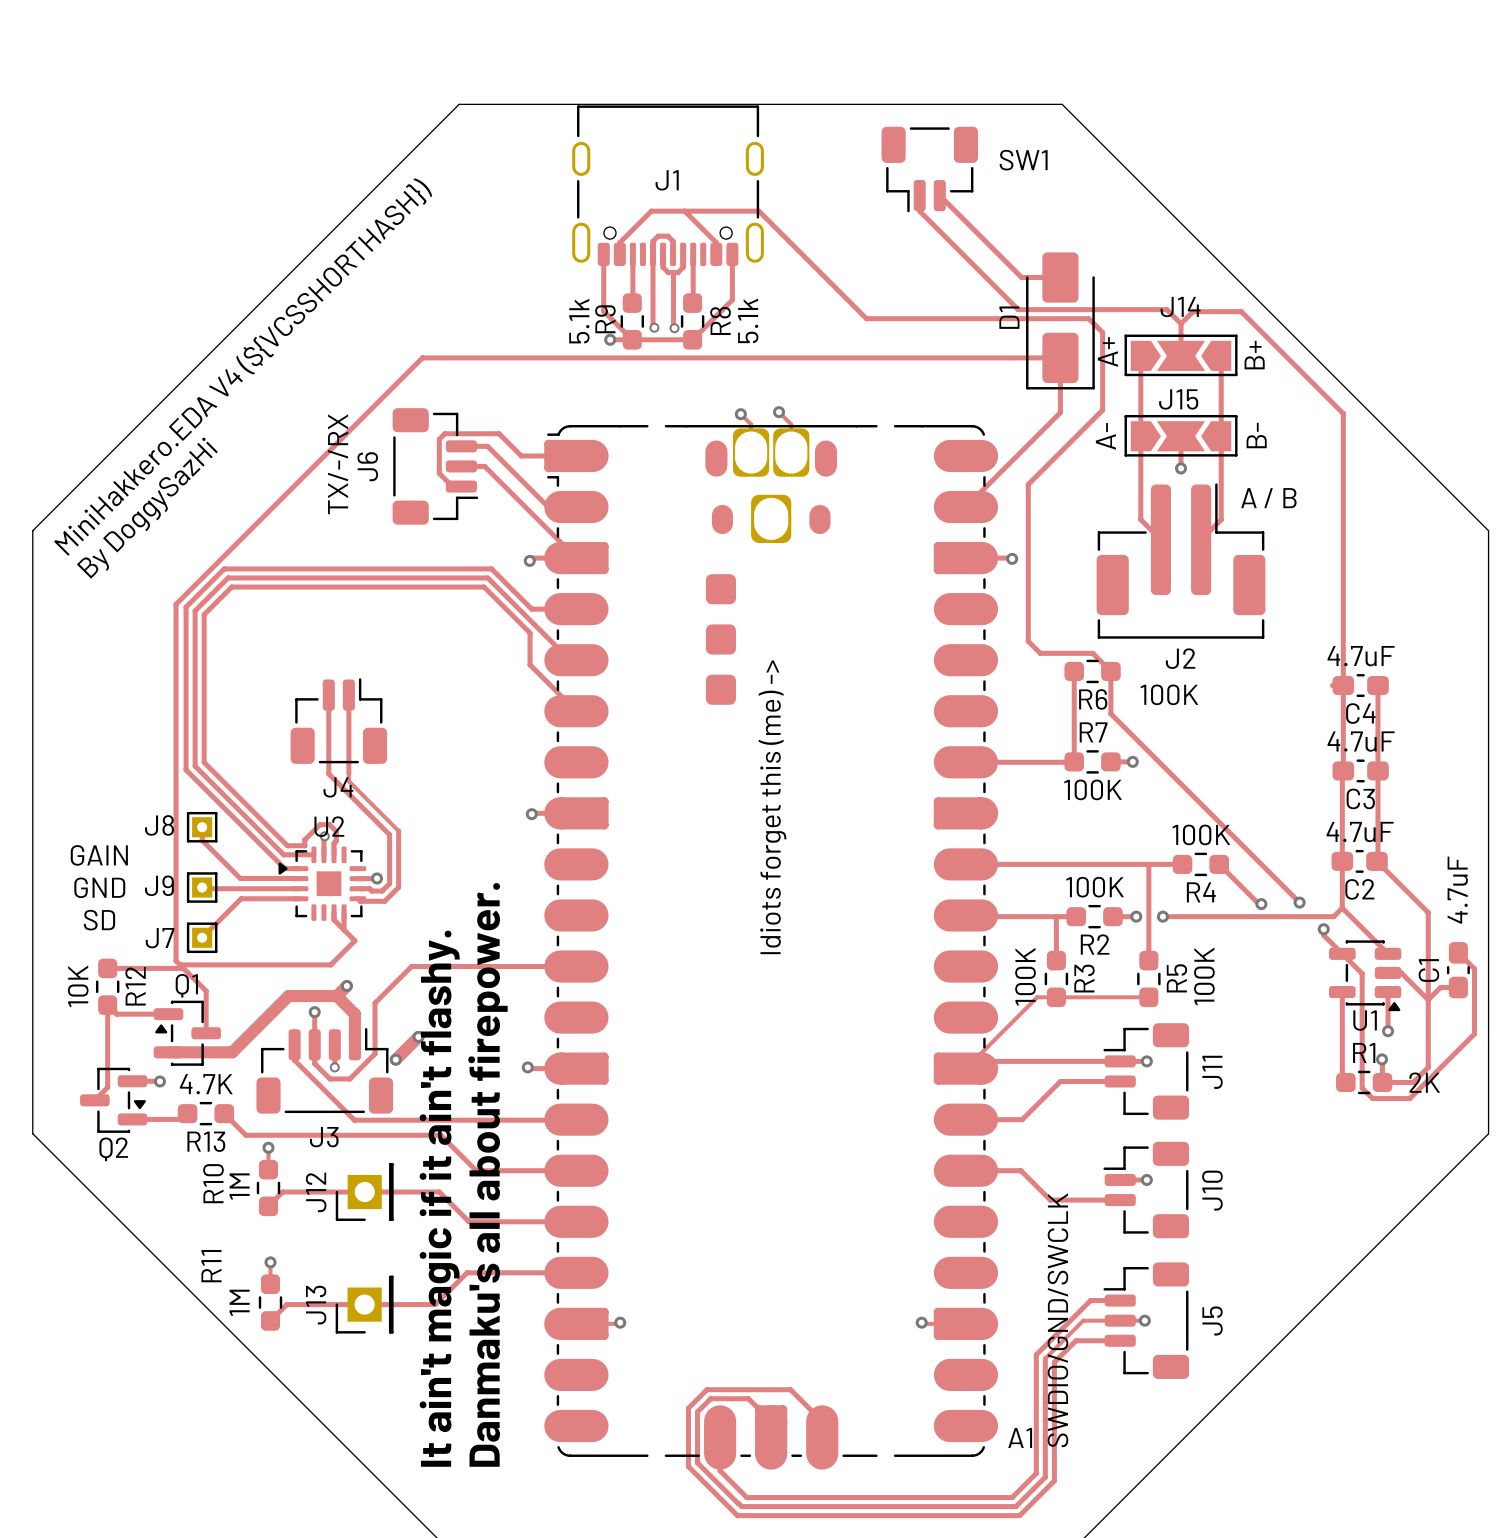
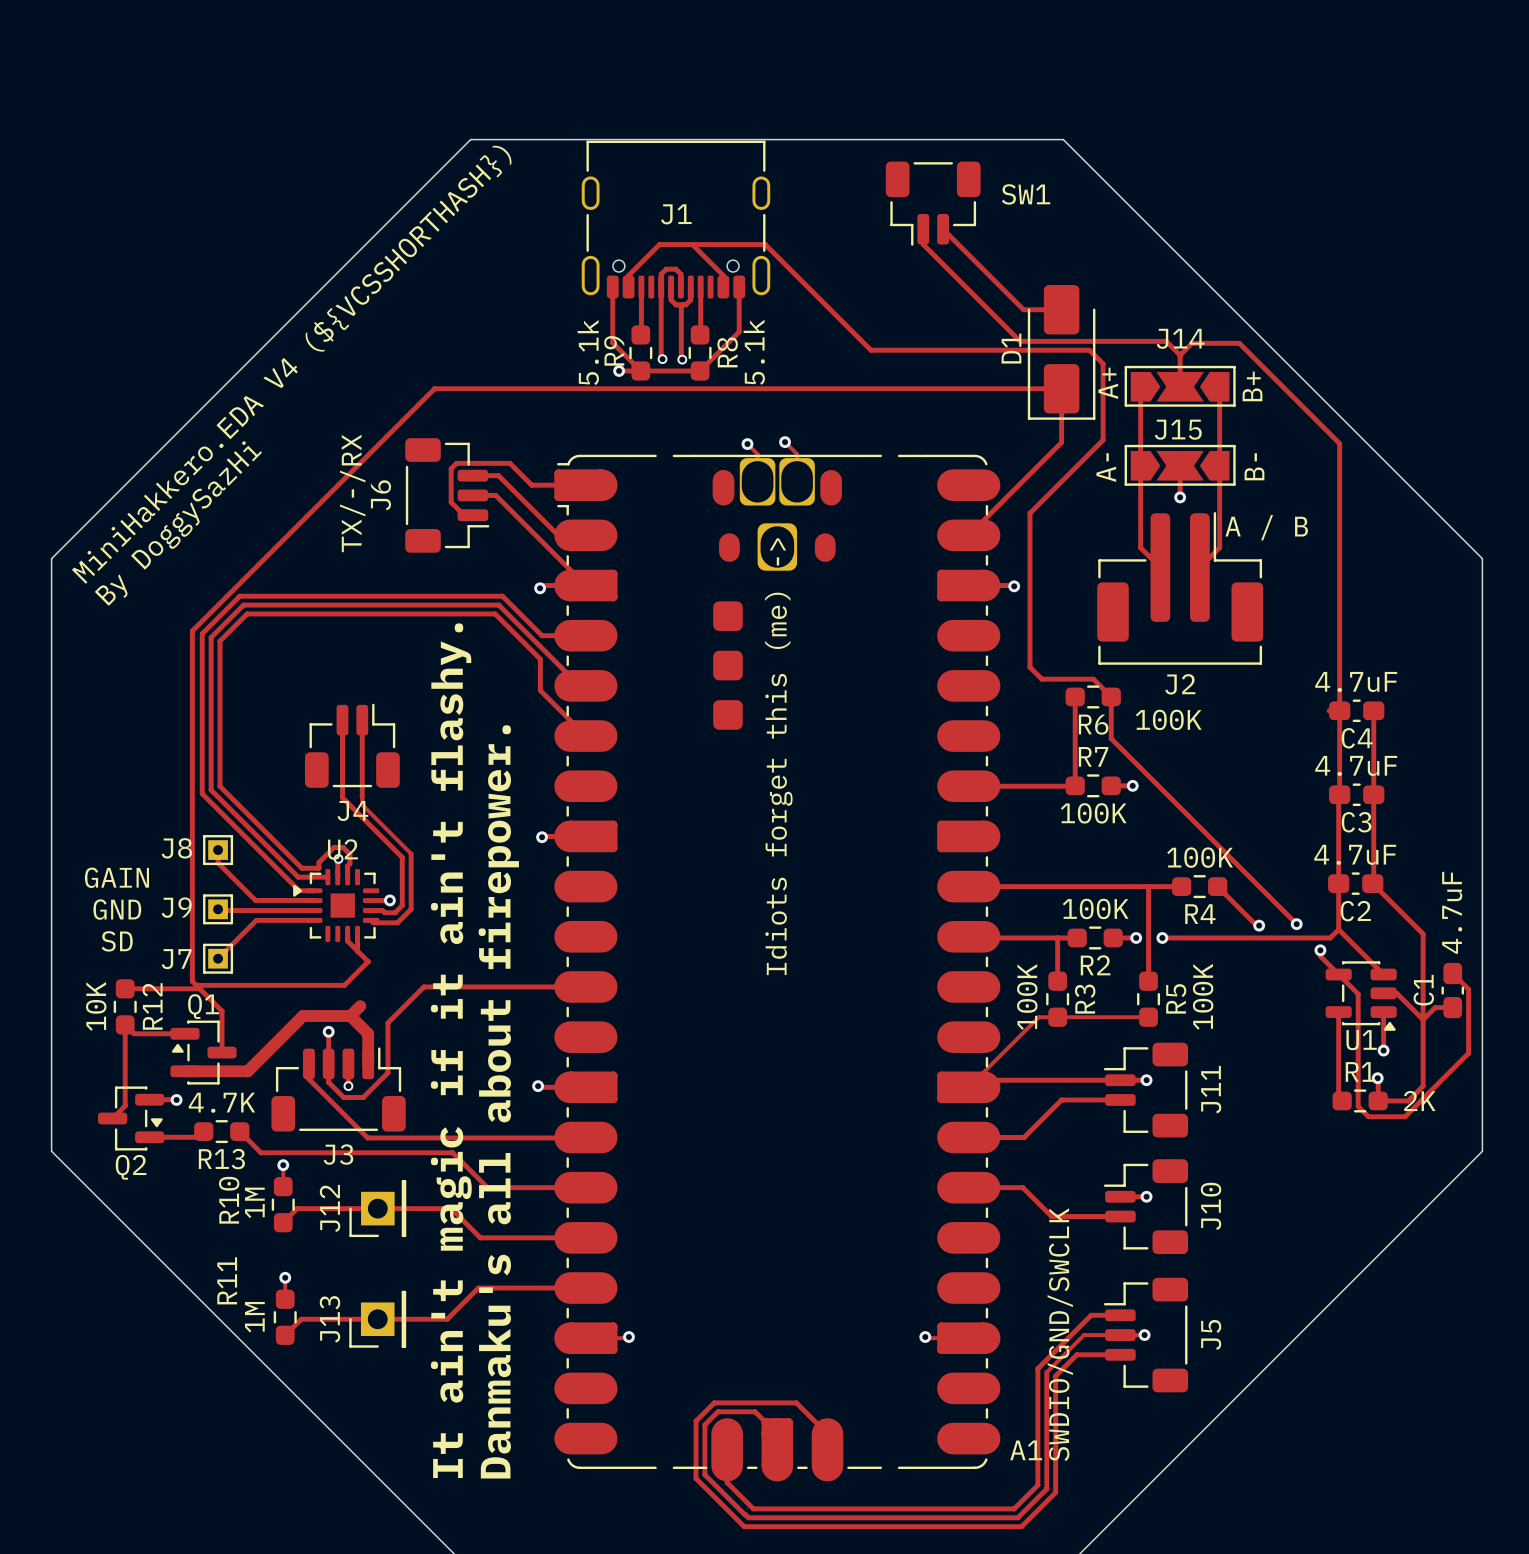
via: (346, 986) -> none
track: (418, 1036) (395, 1059) -> none
via: (418, 1036) -> none
via: (395, 1059) -> none

